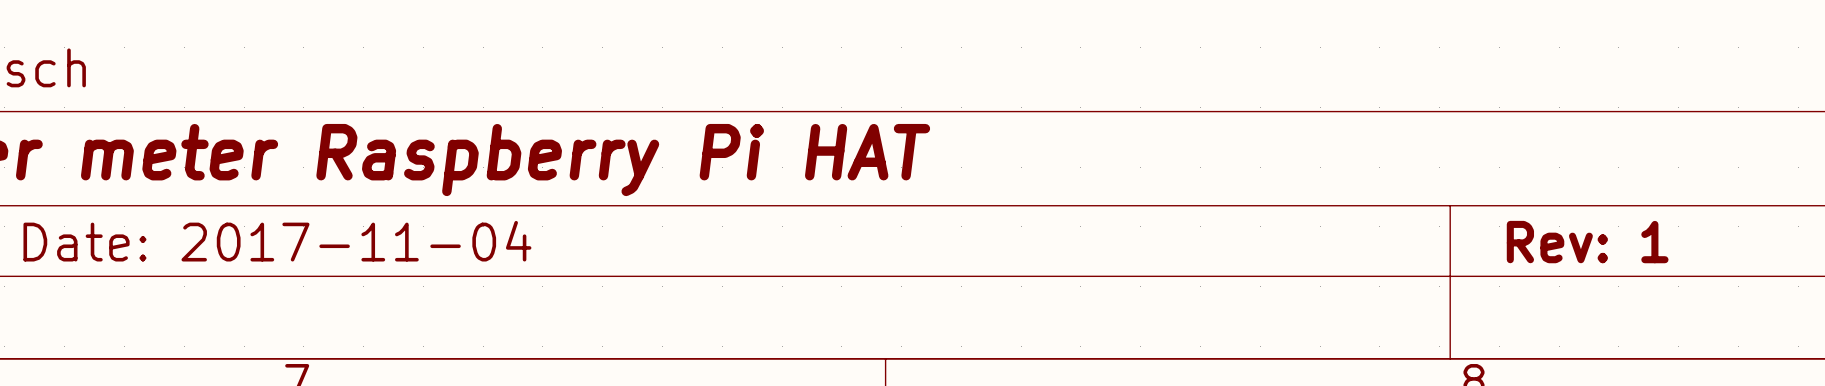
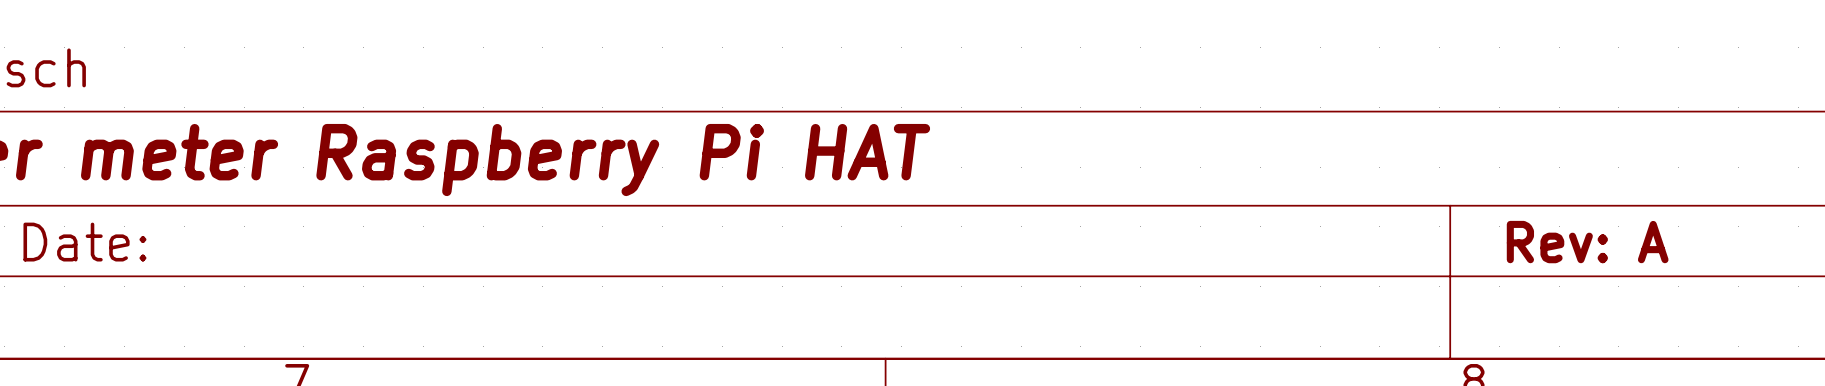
title block: Date: 2017-11-04 (277, 241) -> Date: (84, 242)
title block: Rev: 1 (1587, 242) -> Rev: A (1587, 242)

